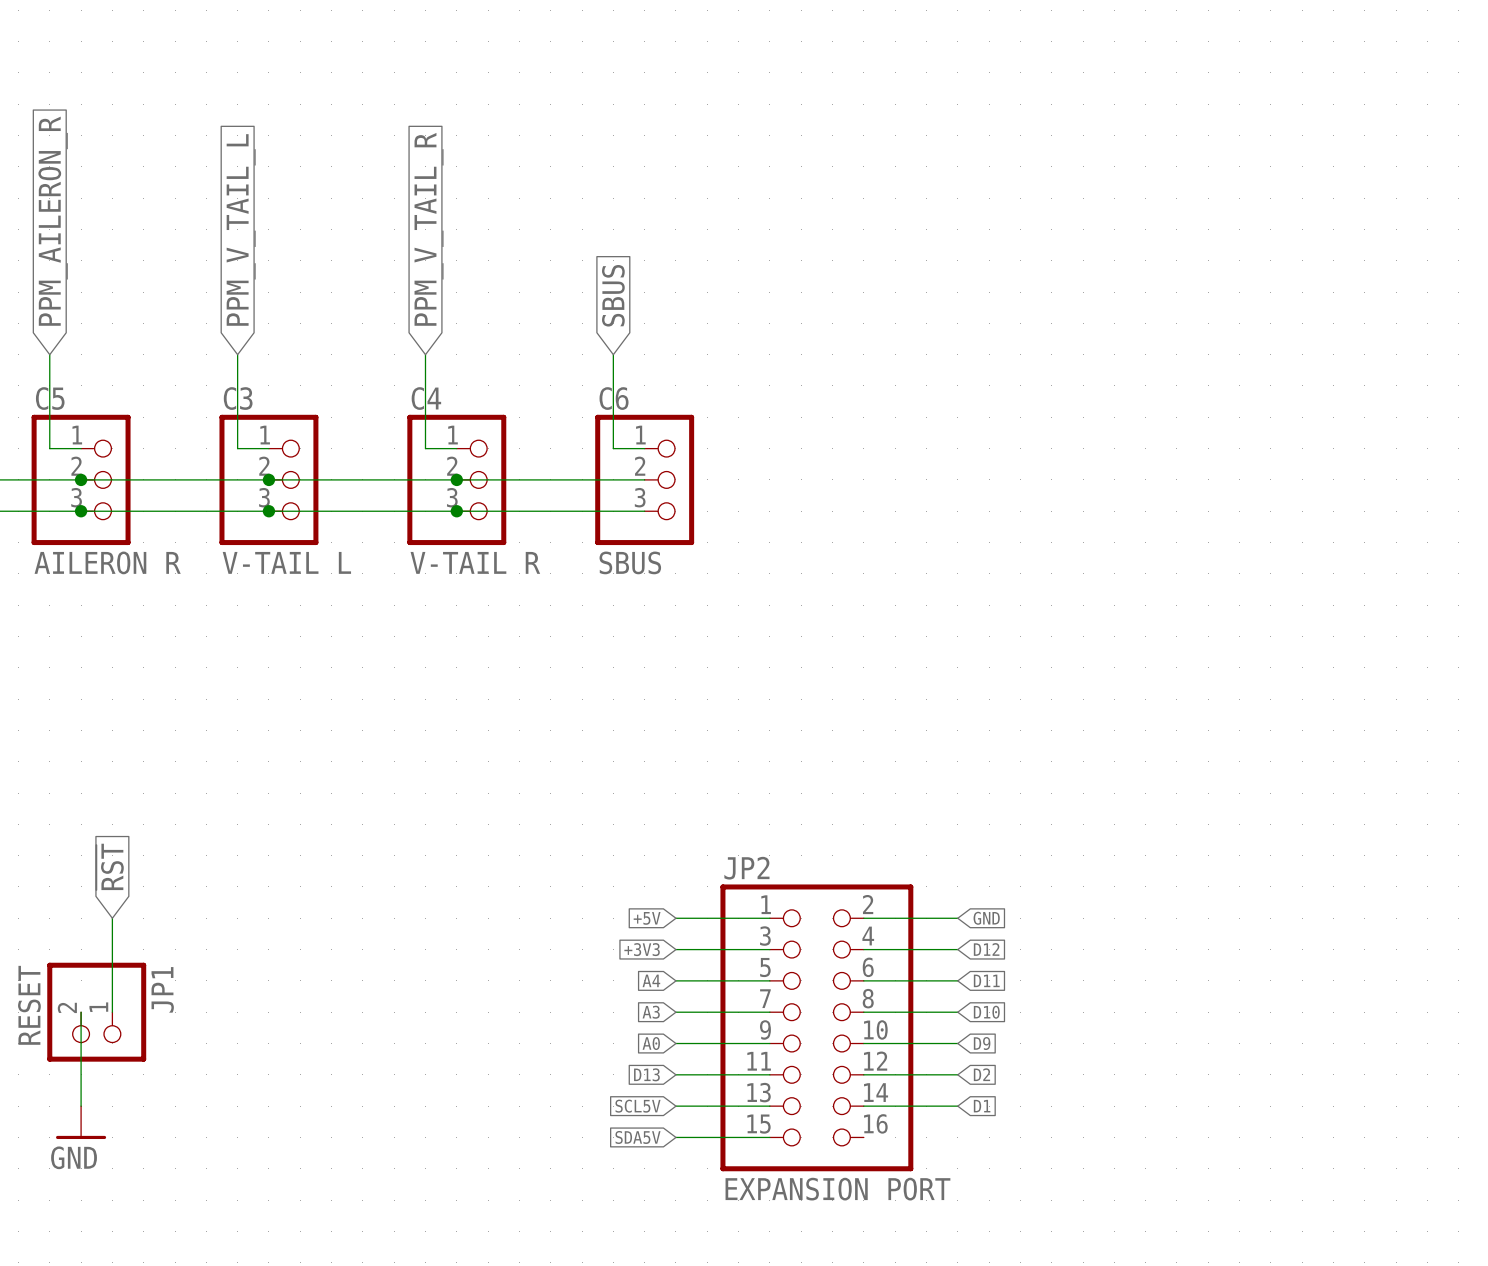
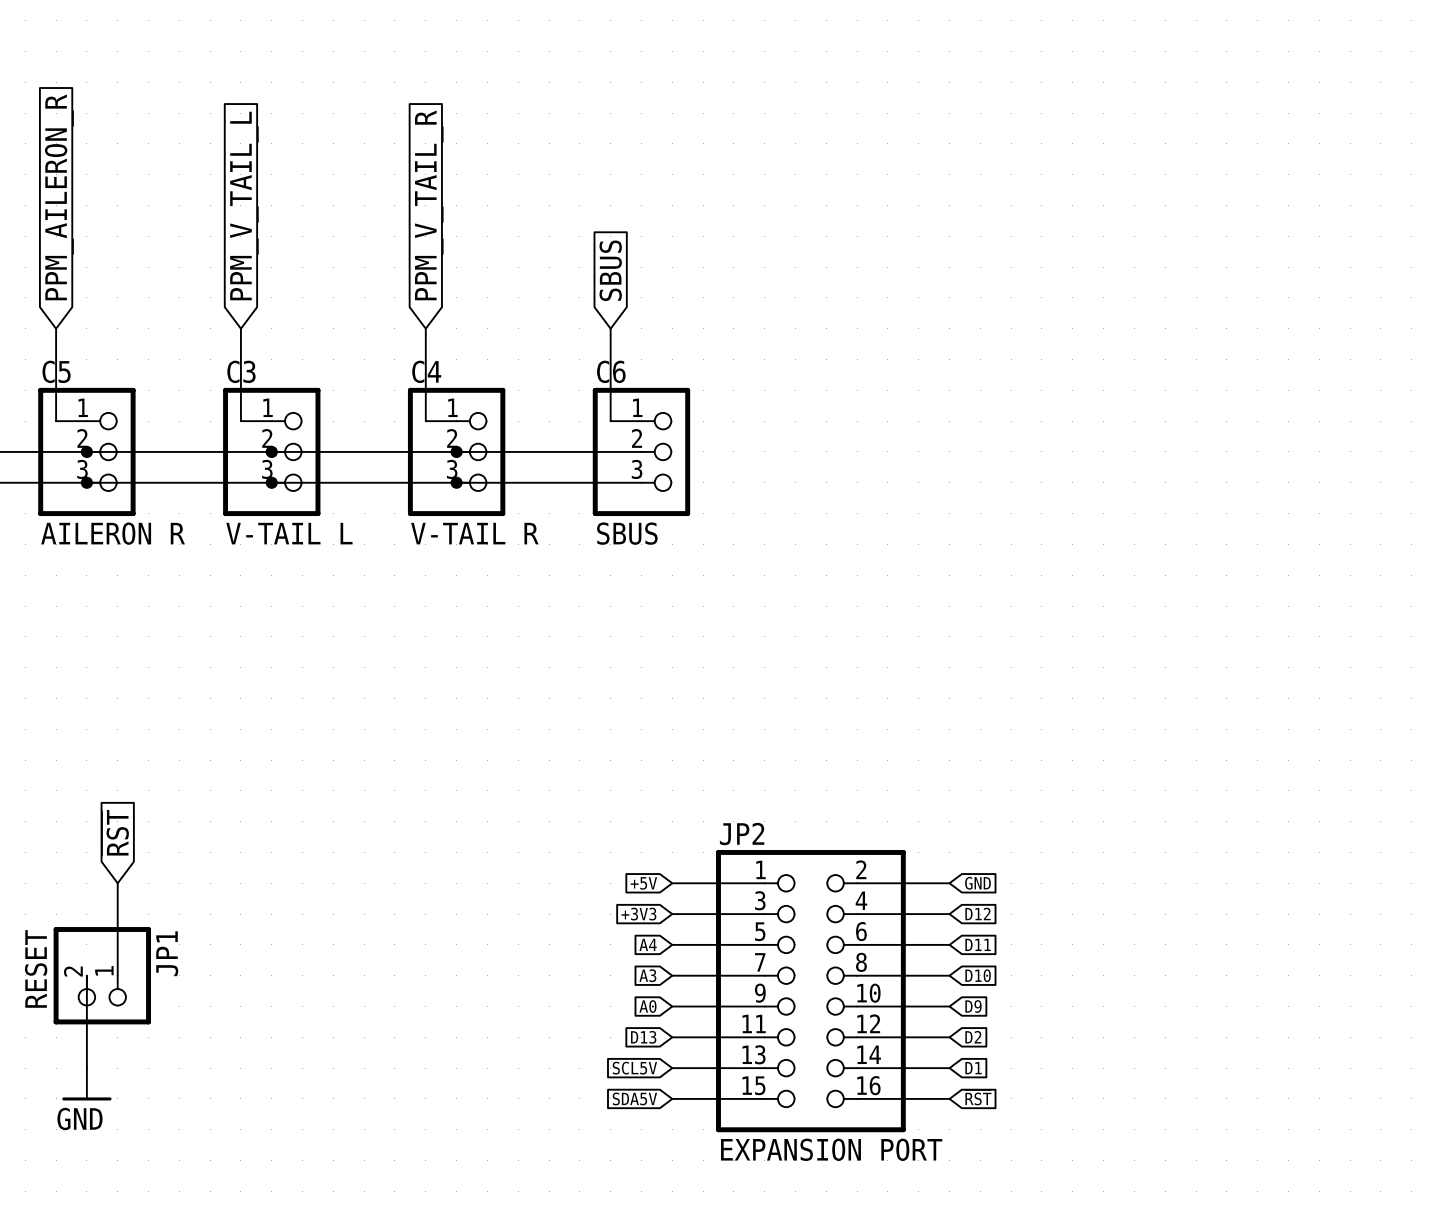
global label: none -> ~{RST} (978, 1097)
wire: none -> (857, 1098) (949, 1098)

